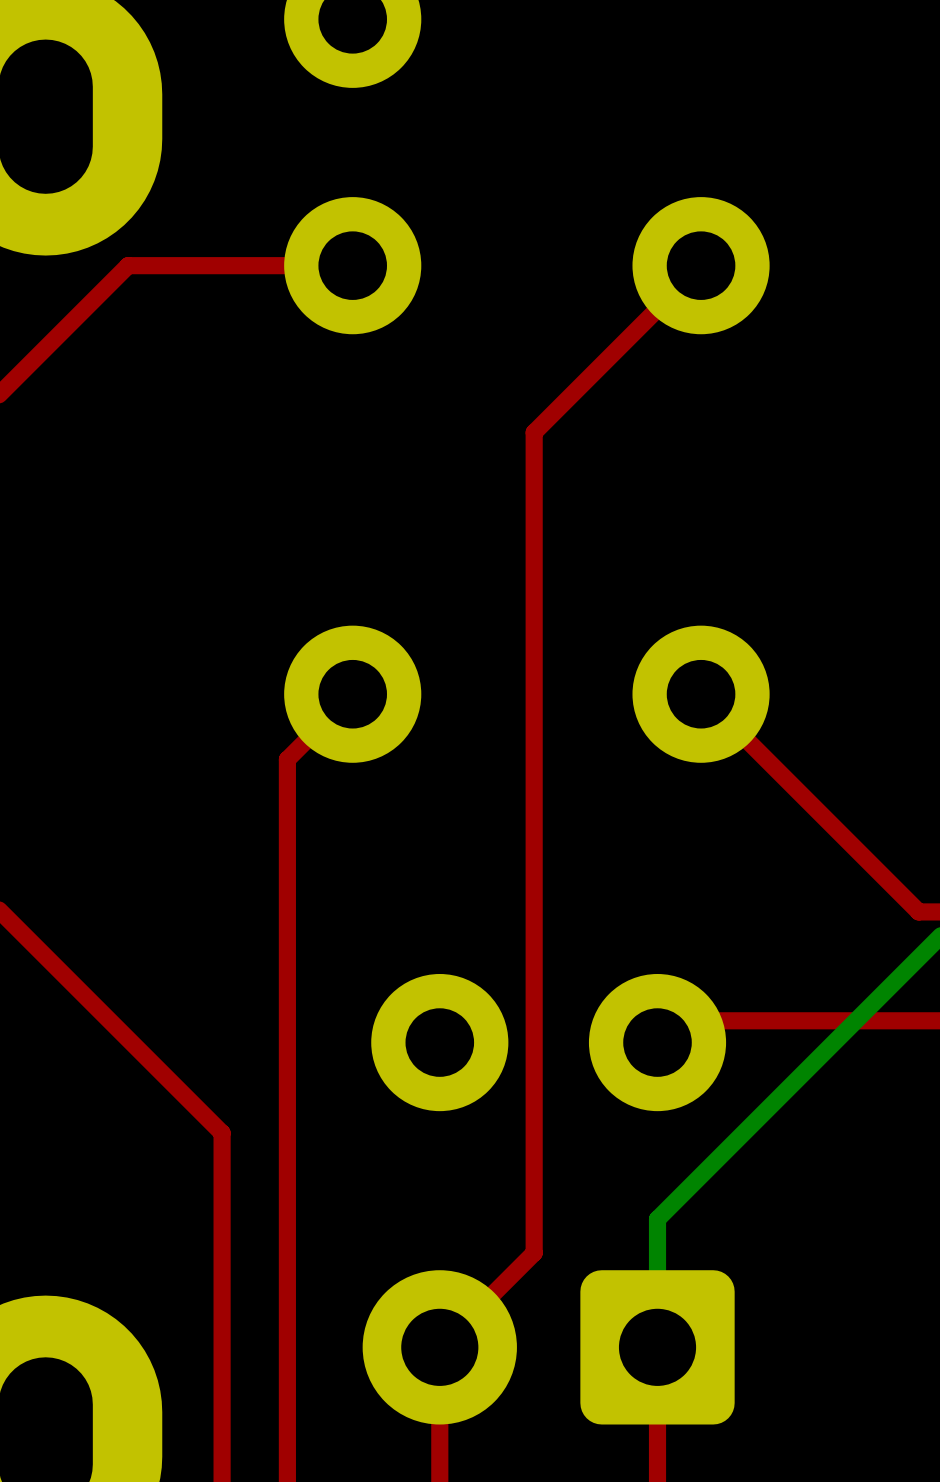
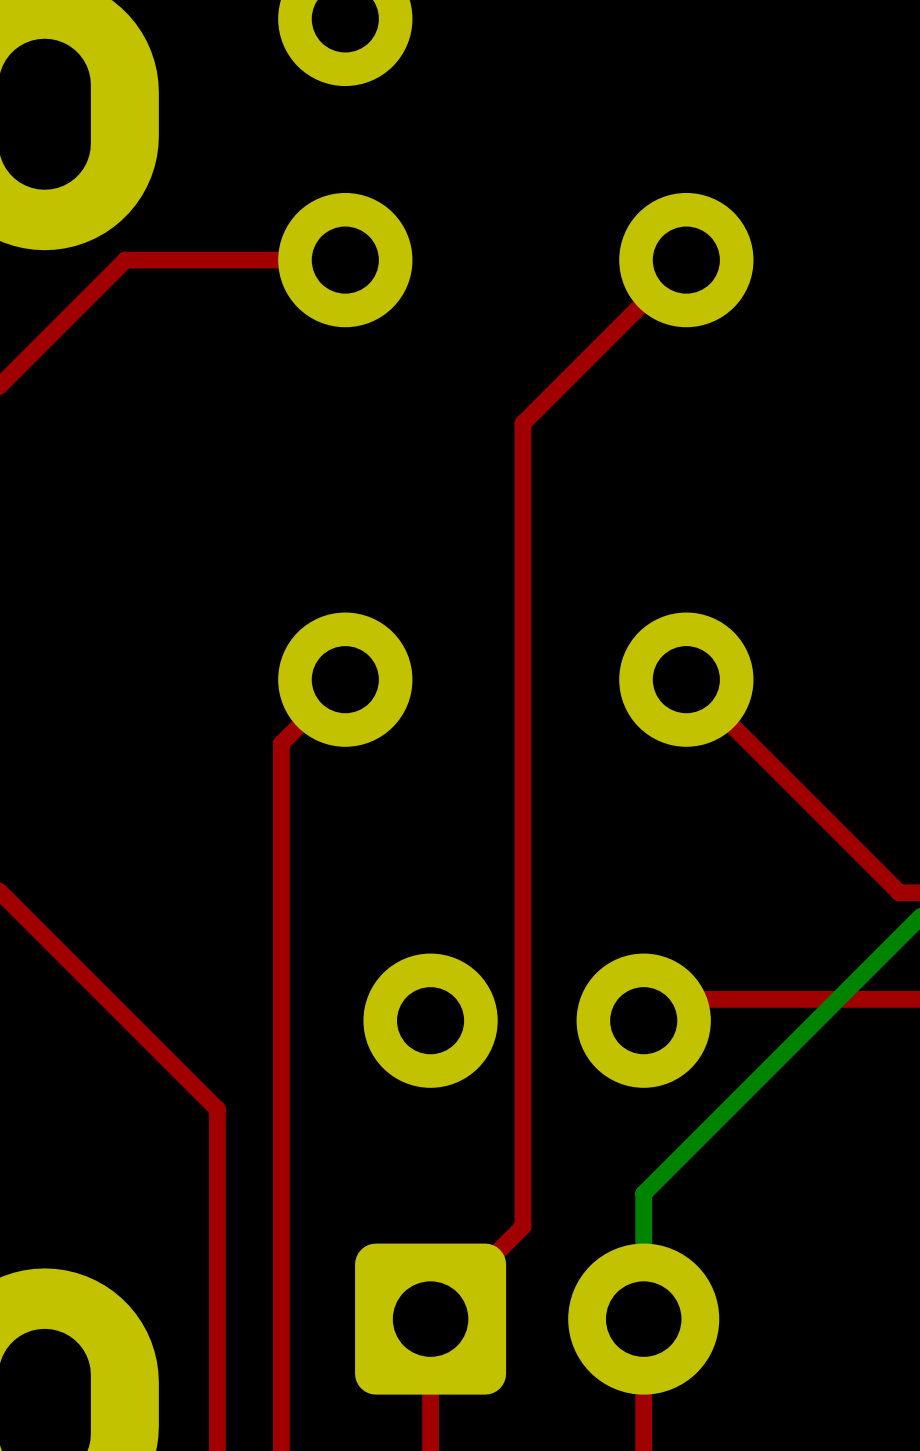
part rotation: 0° (548, 1347) -> 180° (537, 1319)

